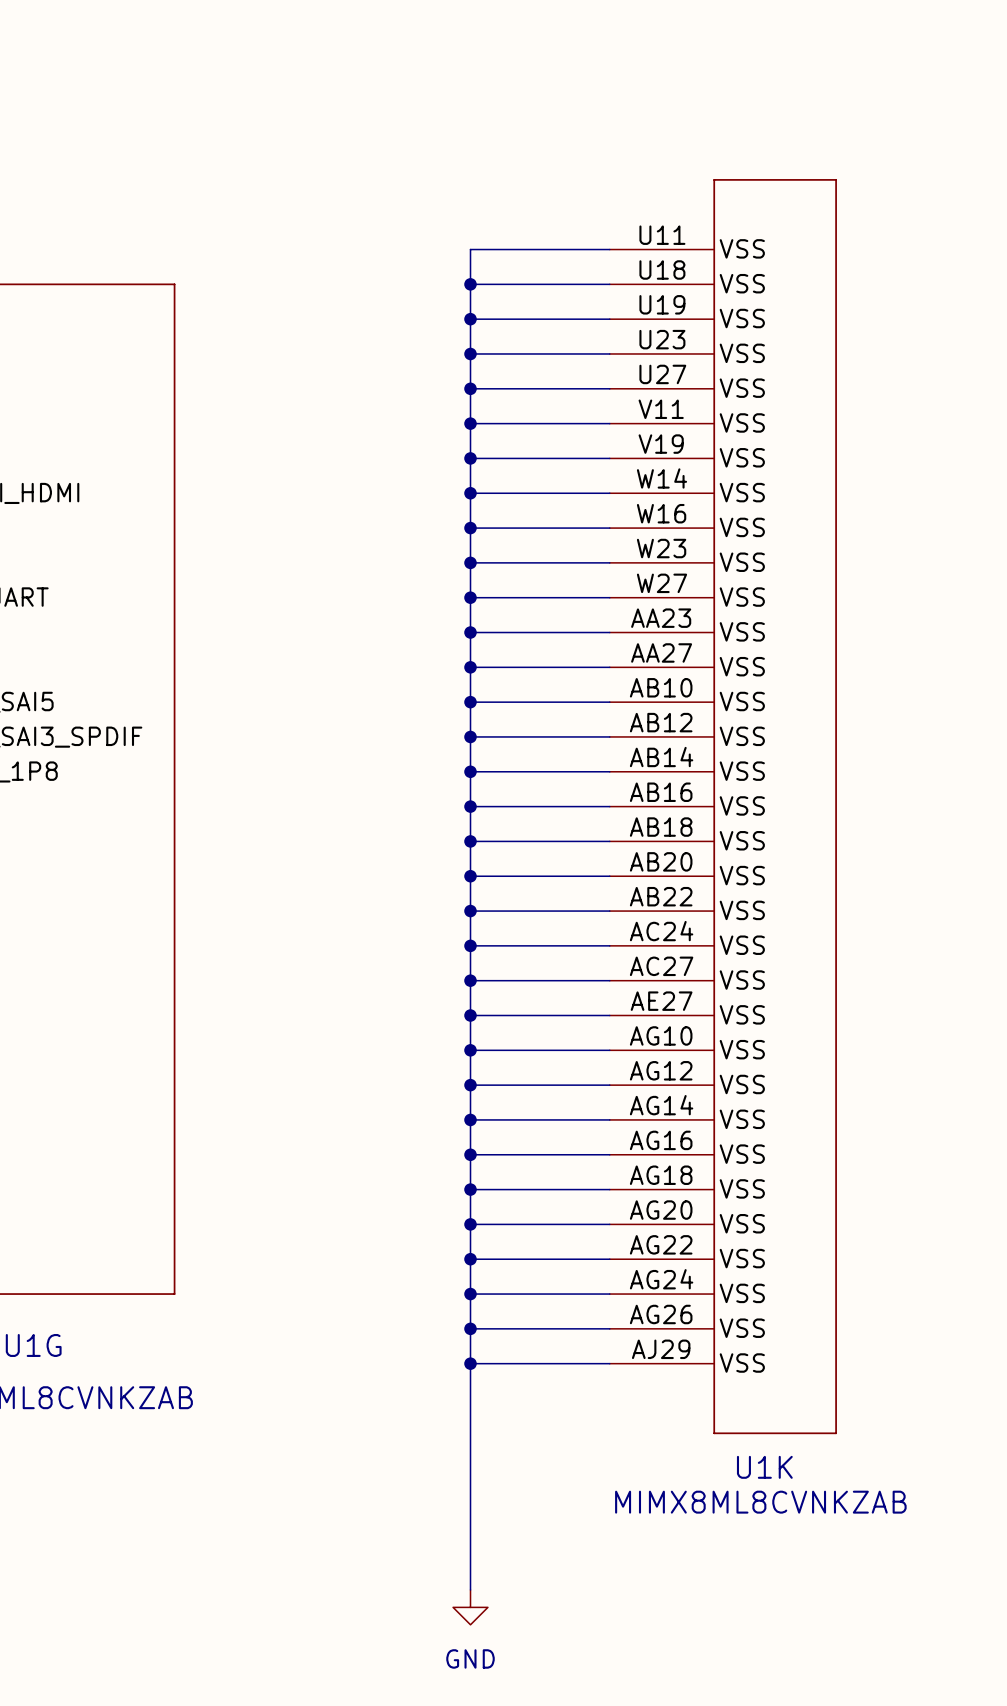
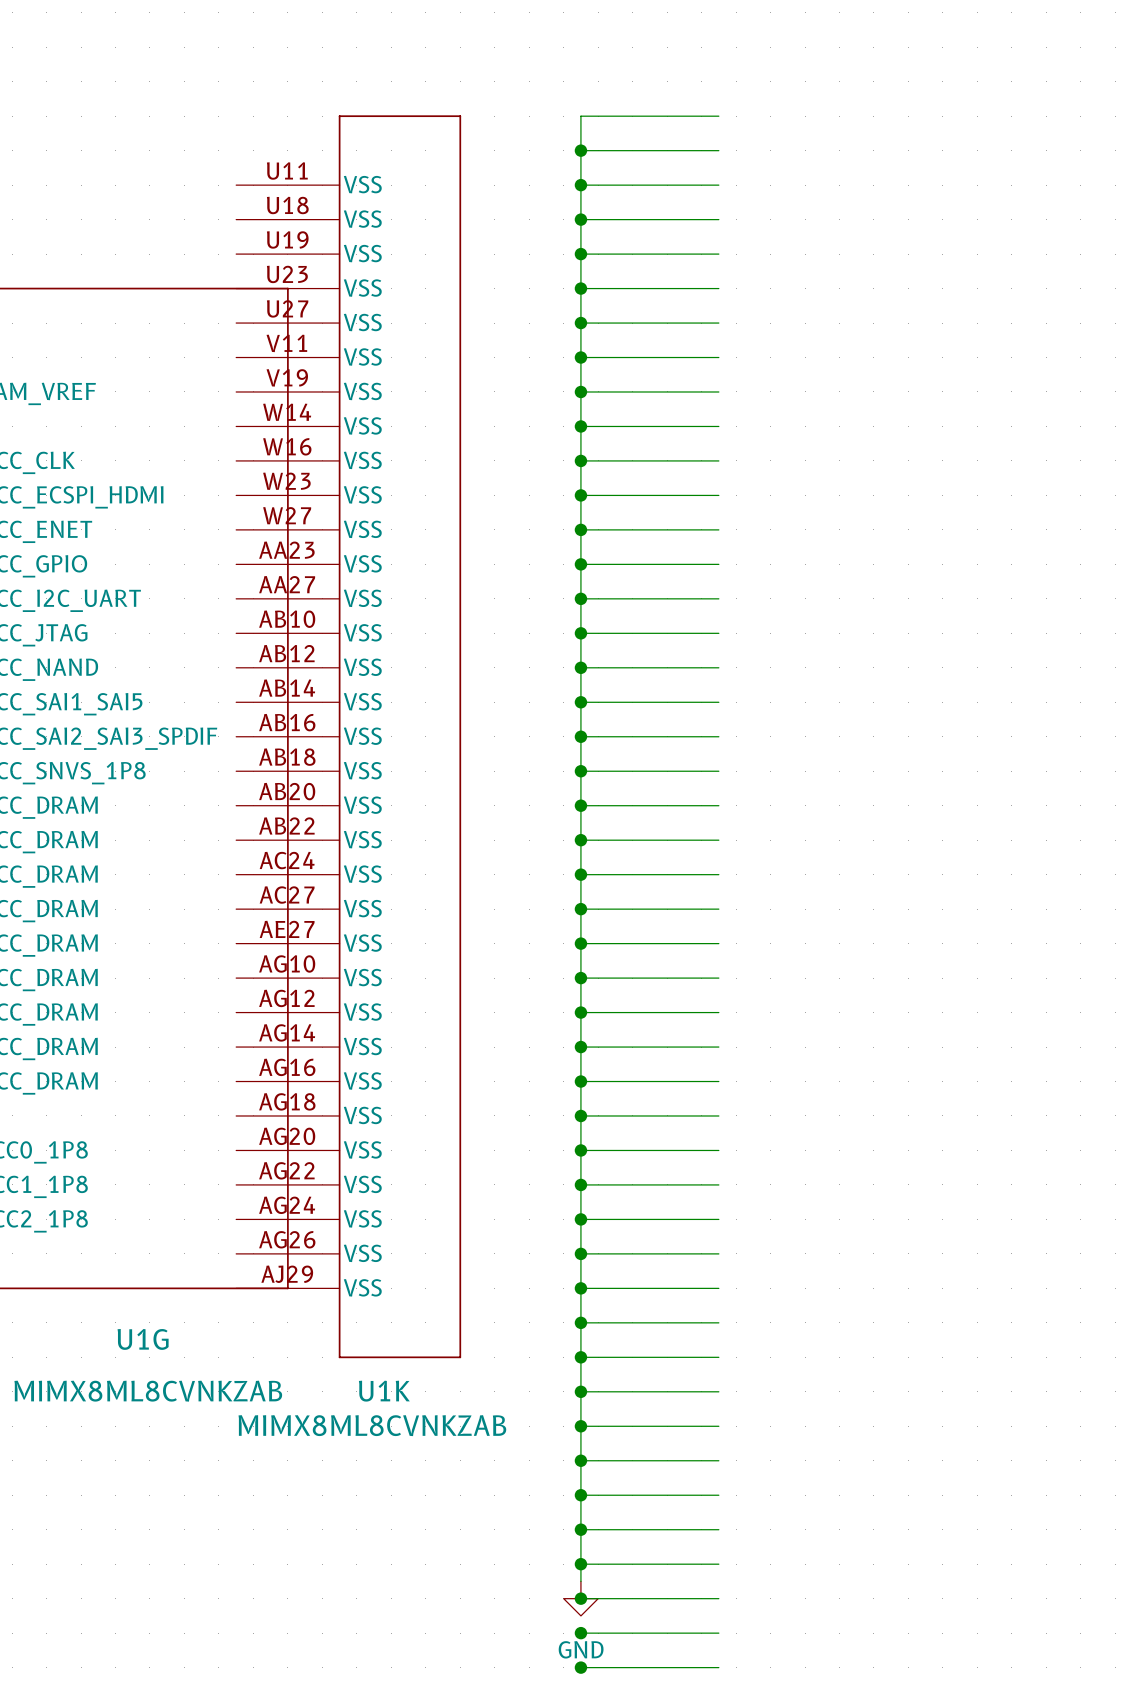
wire: none -> (718, 116) (580, 116) (580, 254)
wire: none -> (580, 150) (718, 150)
junction: none -> (580, 150)
wire: none -> (580, 185) (718, 185)
junction: none -> (580, 185)
wire: none -> (580, 219) (718, 219)
junction: none -> (580, 219)
junction: none -> (580, 254)
U1K position: (723, 806) -> (348, 736)
wire: none -> (580, 1391) (718, 1391)
junction: none -> (580, 1391)
wire: none -> (580, 1426) (718, 1426)
junction: none -> (580, 1426)
wire: none -> (580, 1460) (718, 1460)
junction: none -> (580, 1460)
wire: none -> (580, 1495) (718, 1495)
junction: none -> (580, 1495)
wire: none -> (580, 1529) (718, 1529)
junction: none -> (580, 1529)
wire: none -> (580, 1564) (718, 1564)
junction: none -> (580, 1564)
wire: none -> (580, 1598) (718, 1598)
junction: none -> (580, 1598)
wire: none -> (580, 1633) (718, 1633)
junction: none -> (580, 1633)
wire: none -> (580, 1667) (718, 1667)
junction: none -> (580, 1667)

